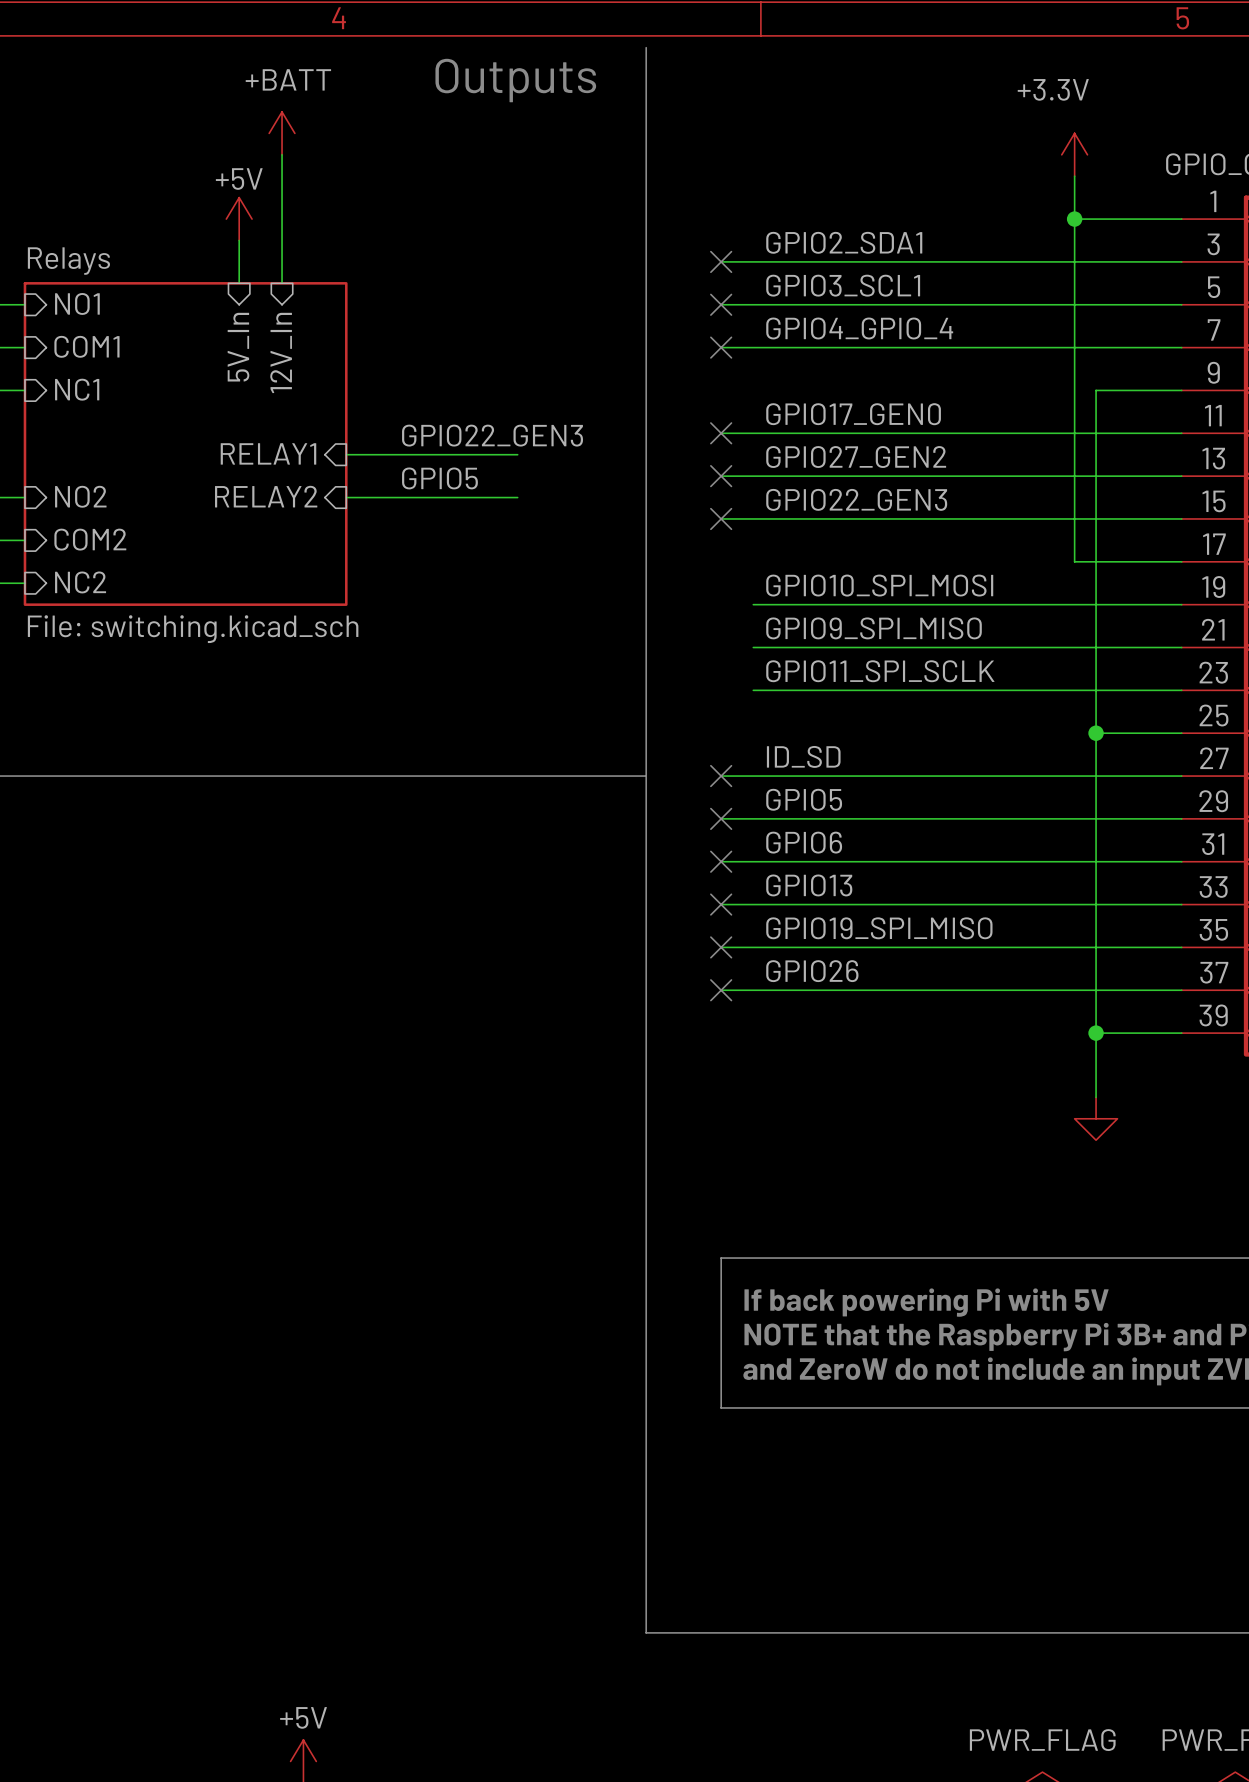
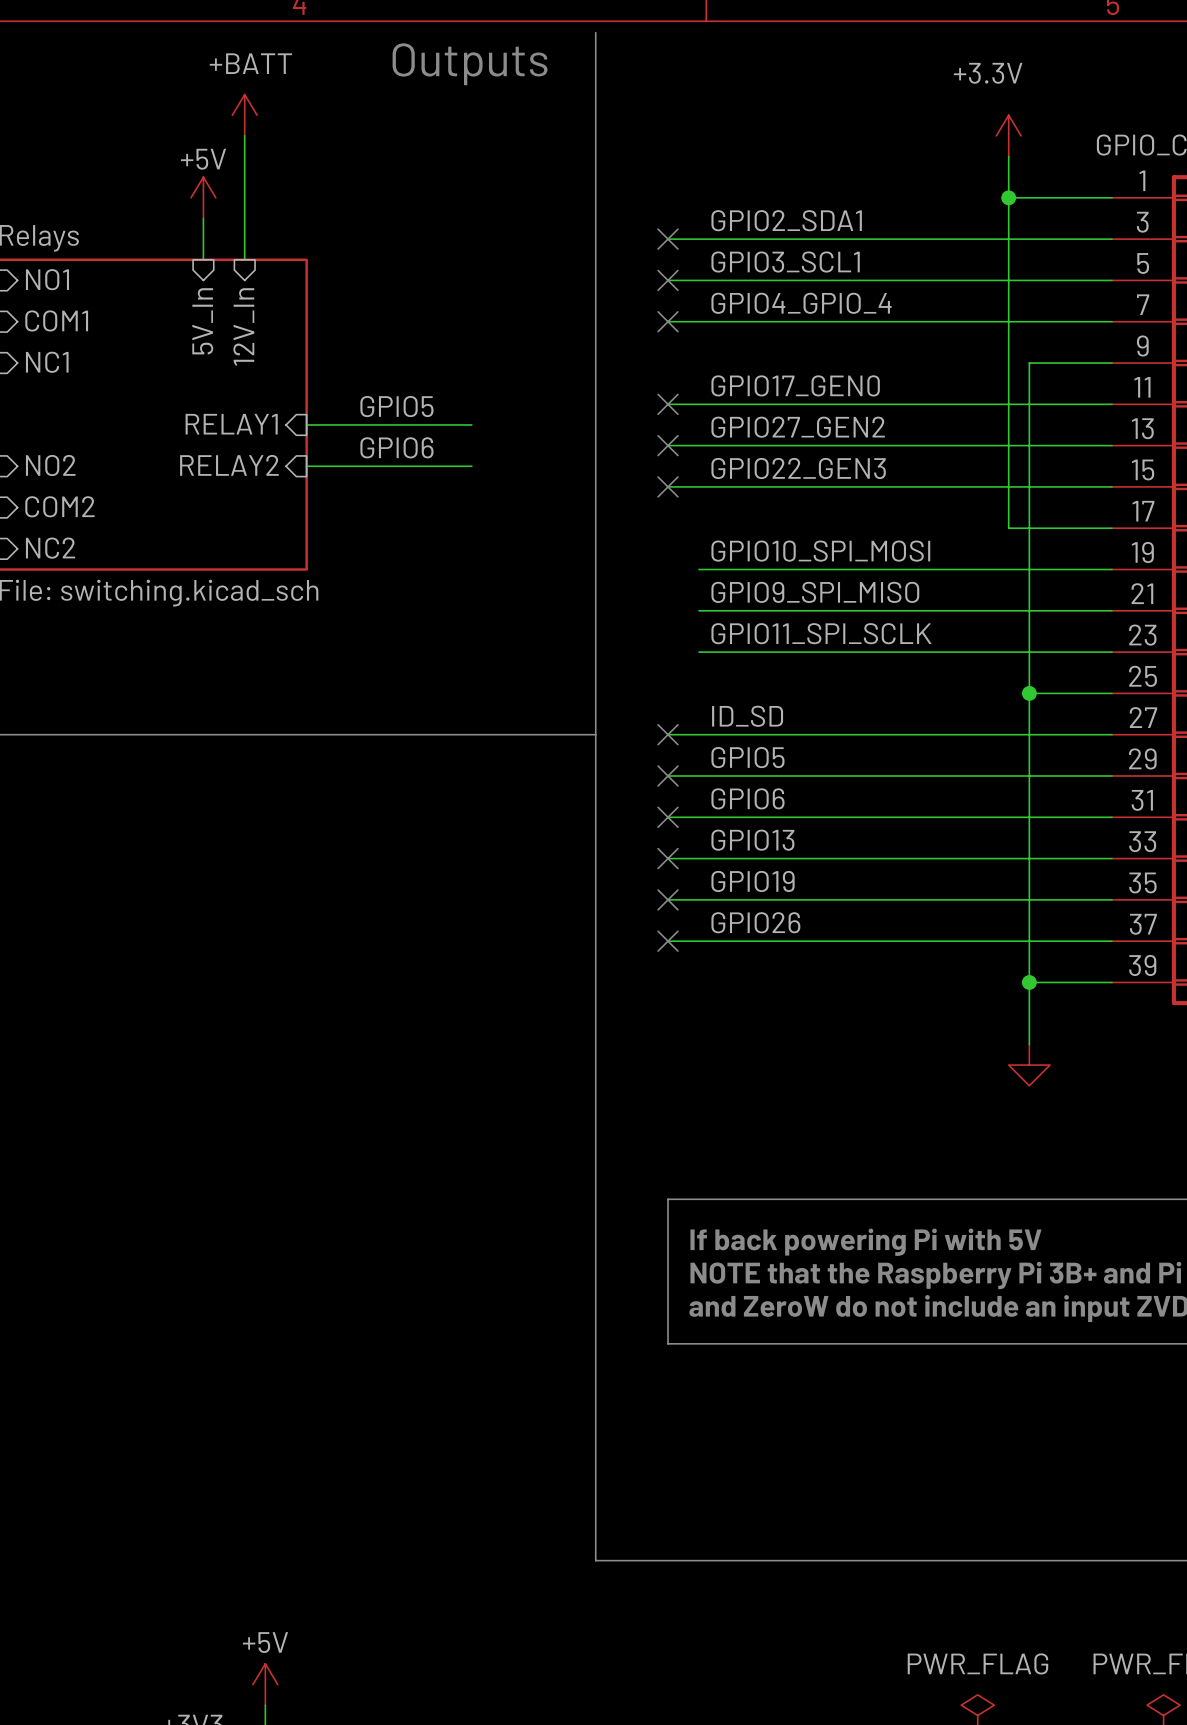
label: GPIO22_GEN3 (492, 435) -> GPIO5 (396, 406)
label: GPIO5 (439, 478) -> GPIO6 (396, 447)
label: GPIO19_SPI_MISO (879, 928) -> GPIO19 (753, 881)

